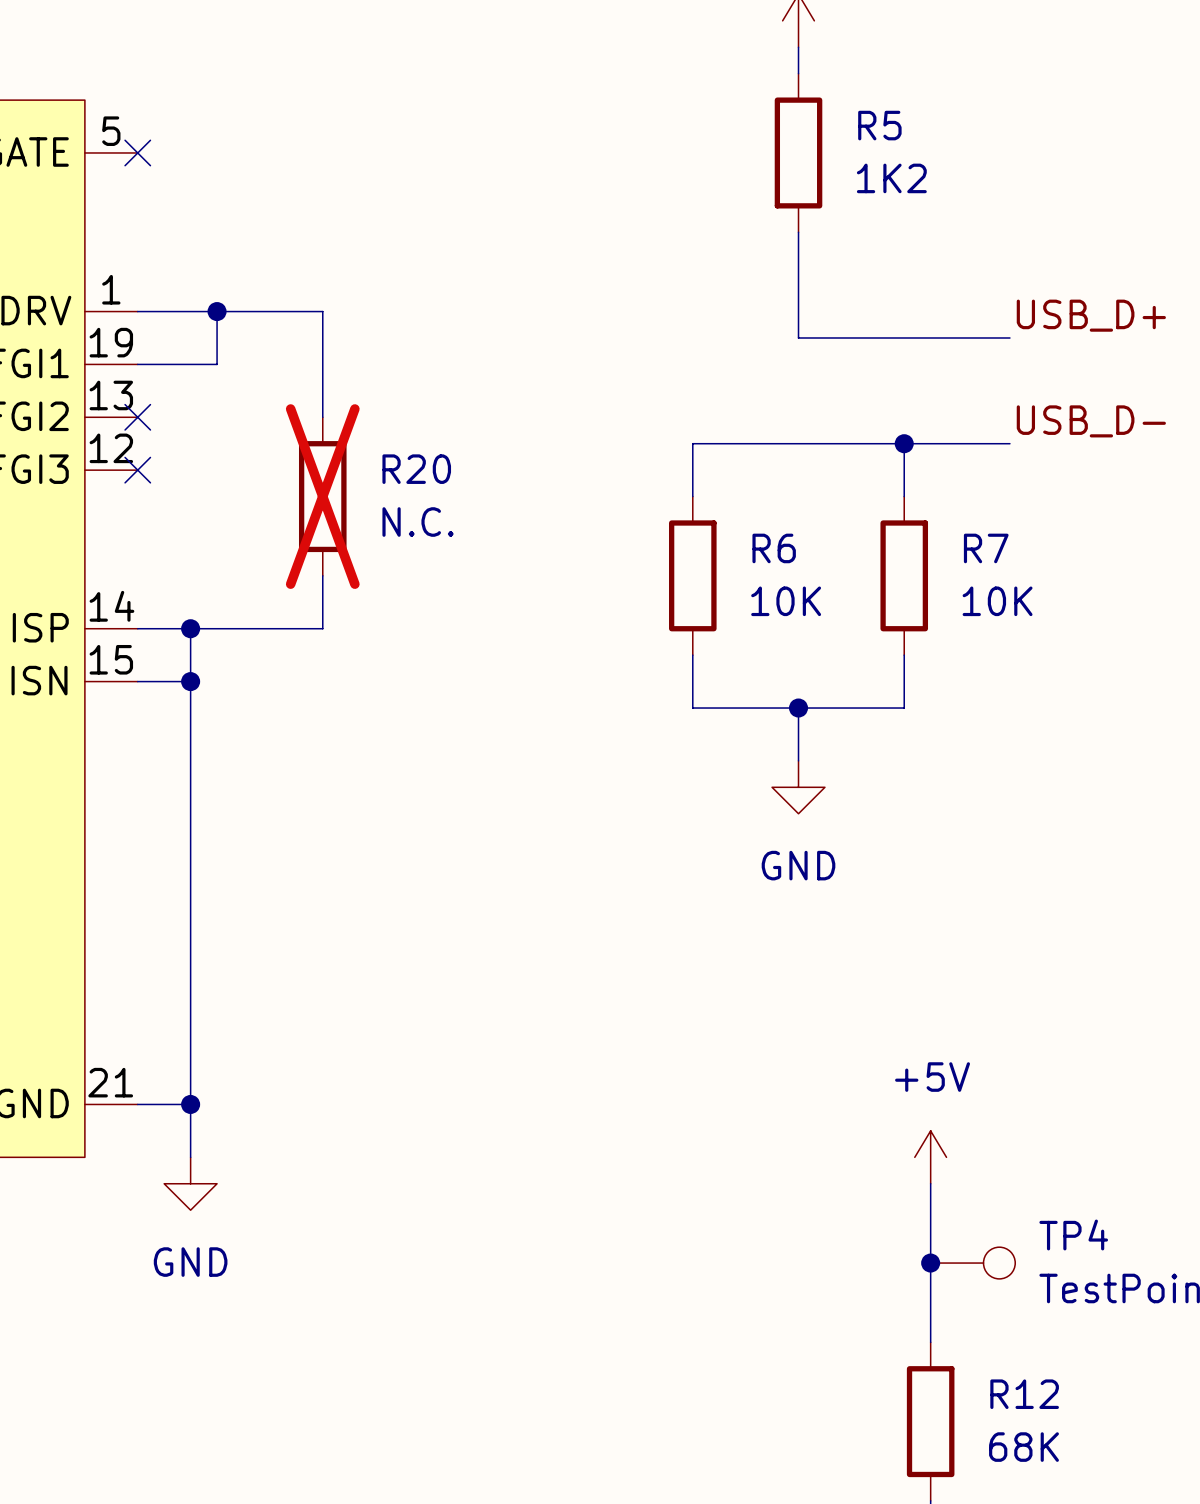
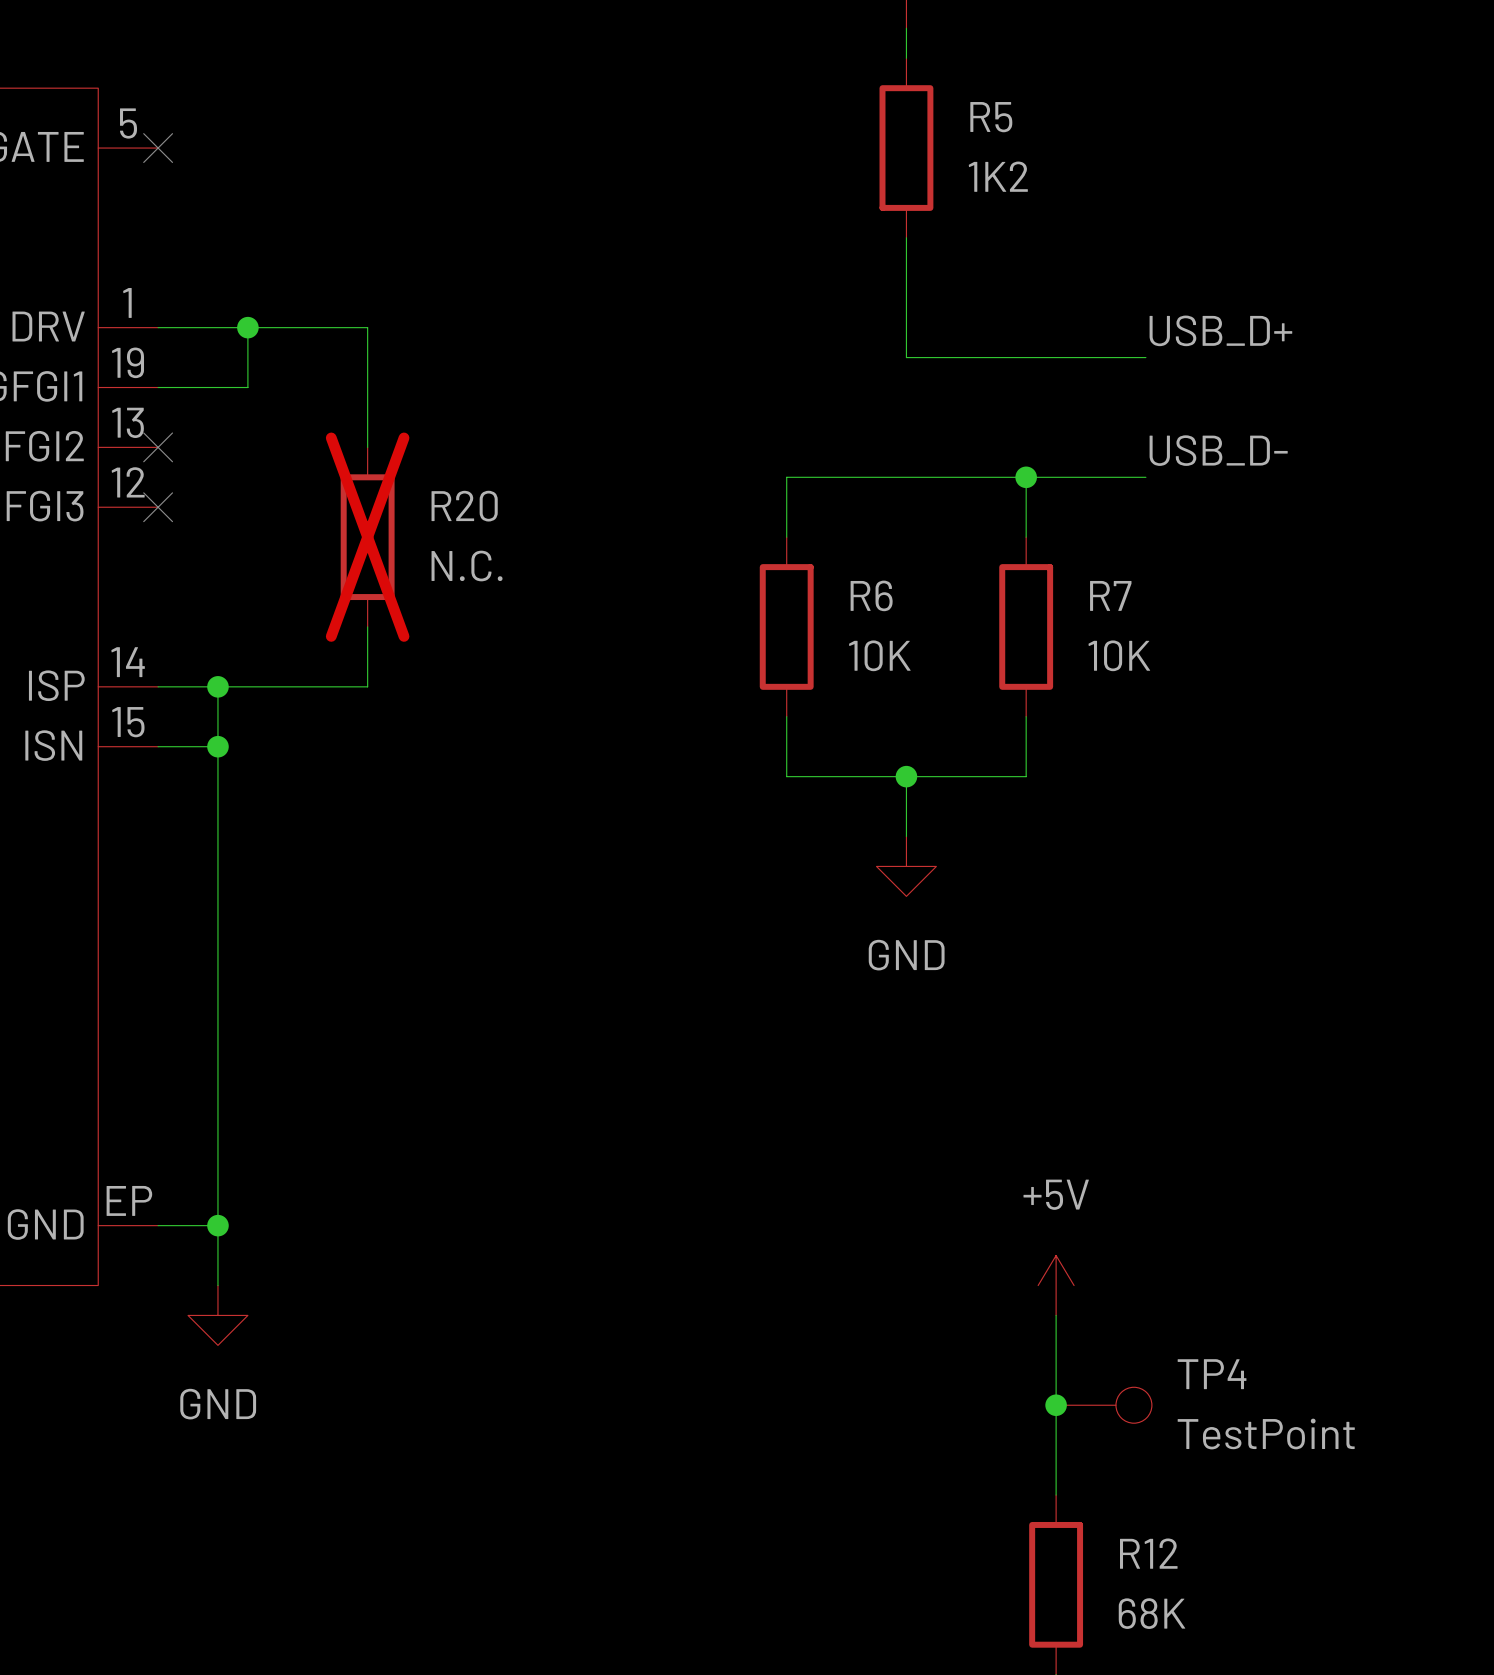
part pin number: 21 (110, 1082) -> EP (129, 1200)

